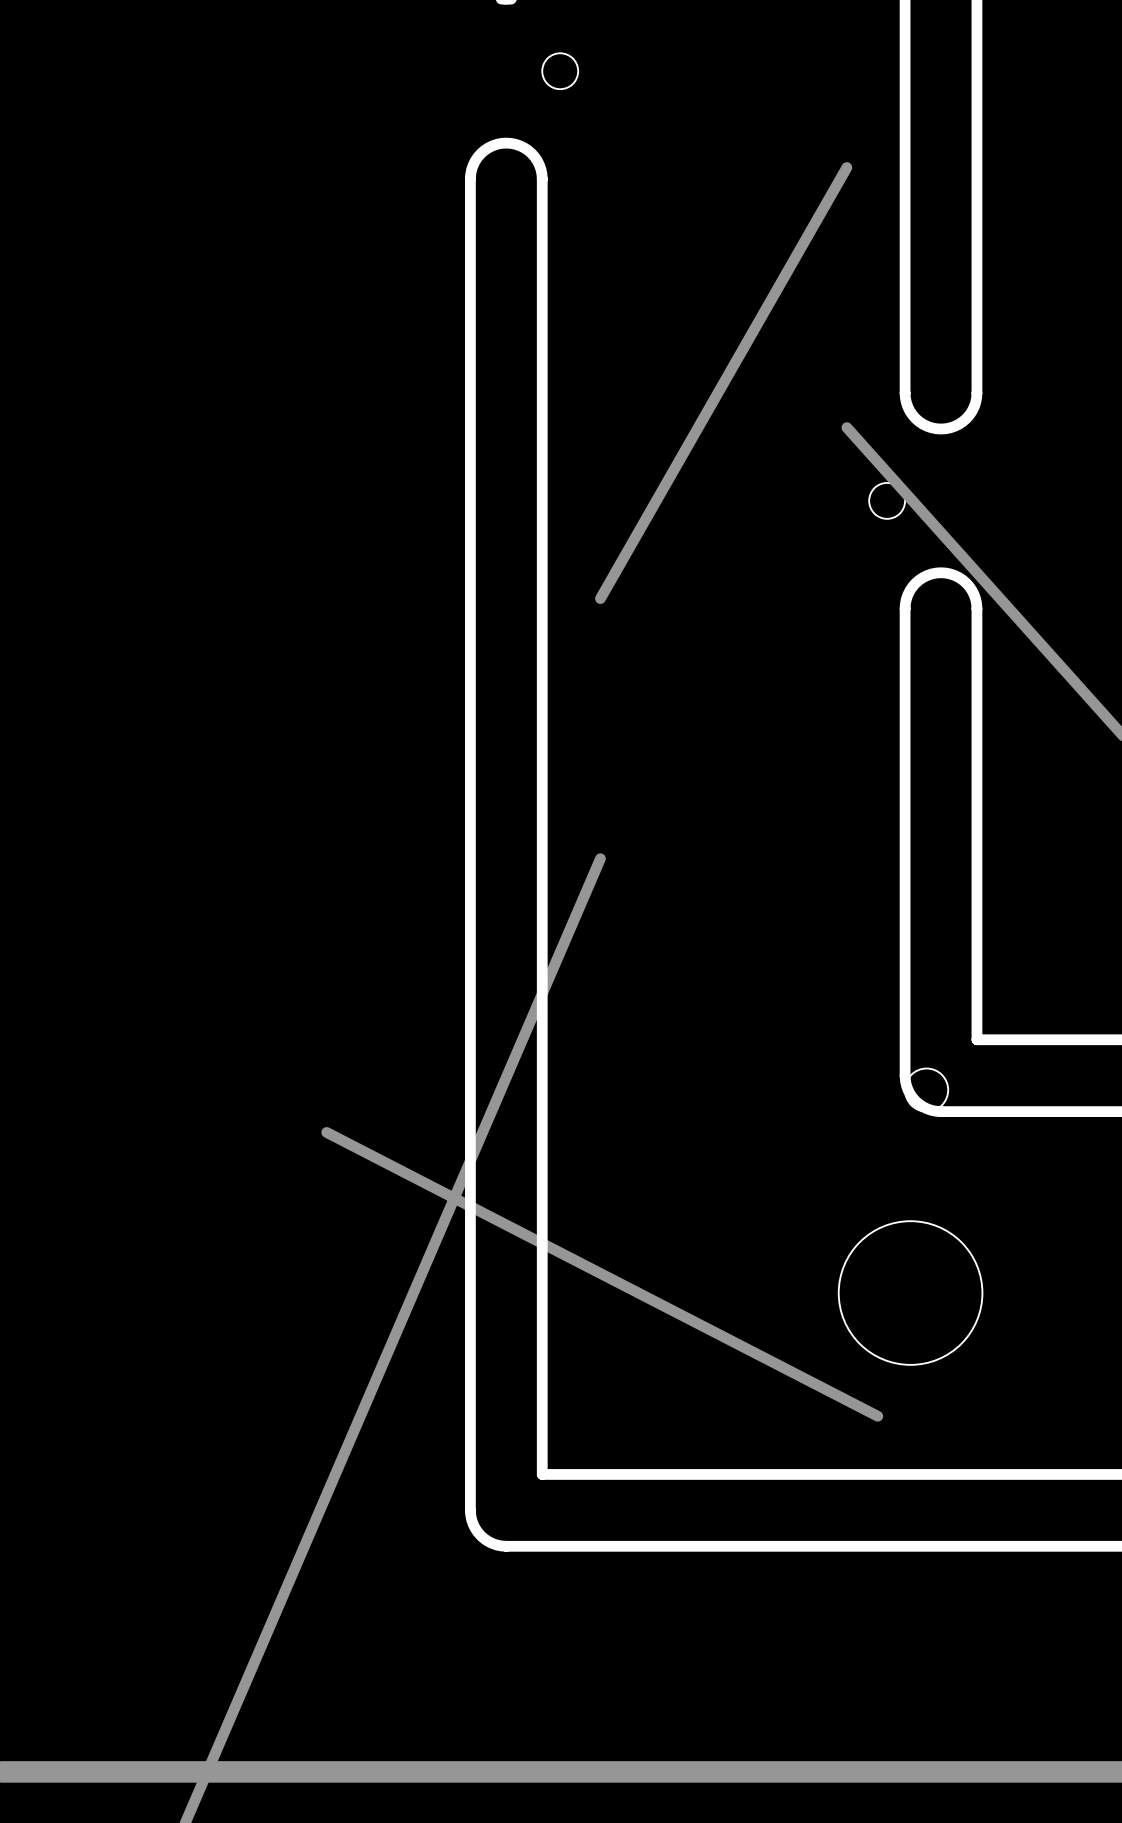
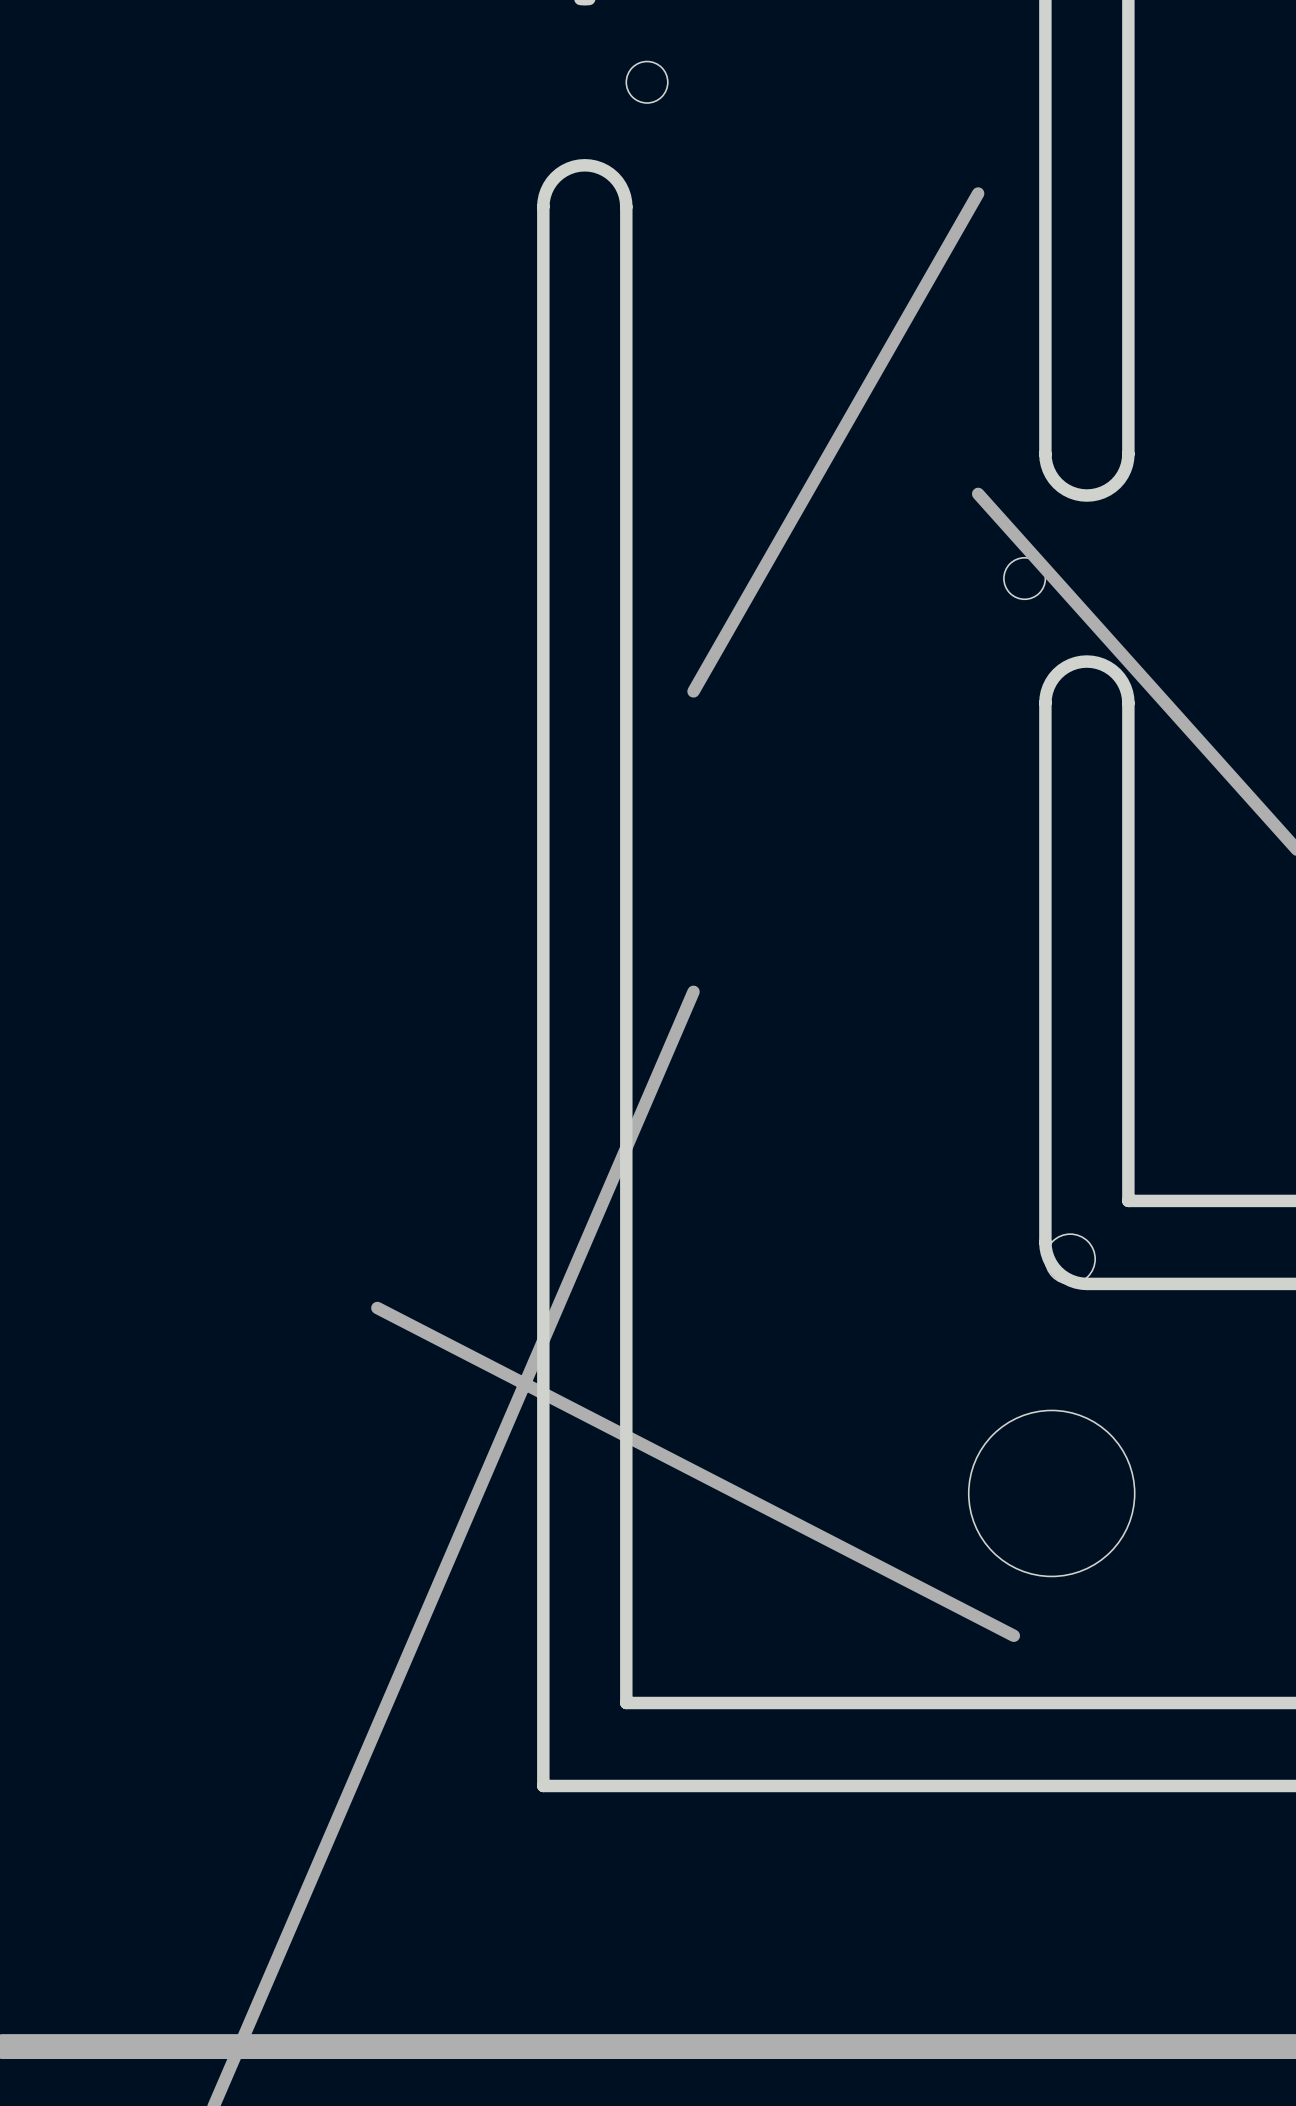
board edge: (470, 1510) (473, 1524) (480, 1535) (492, 1543) (506, 1546) -> (543, 1744) (543, 1785) (584, 1785)

